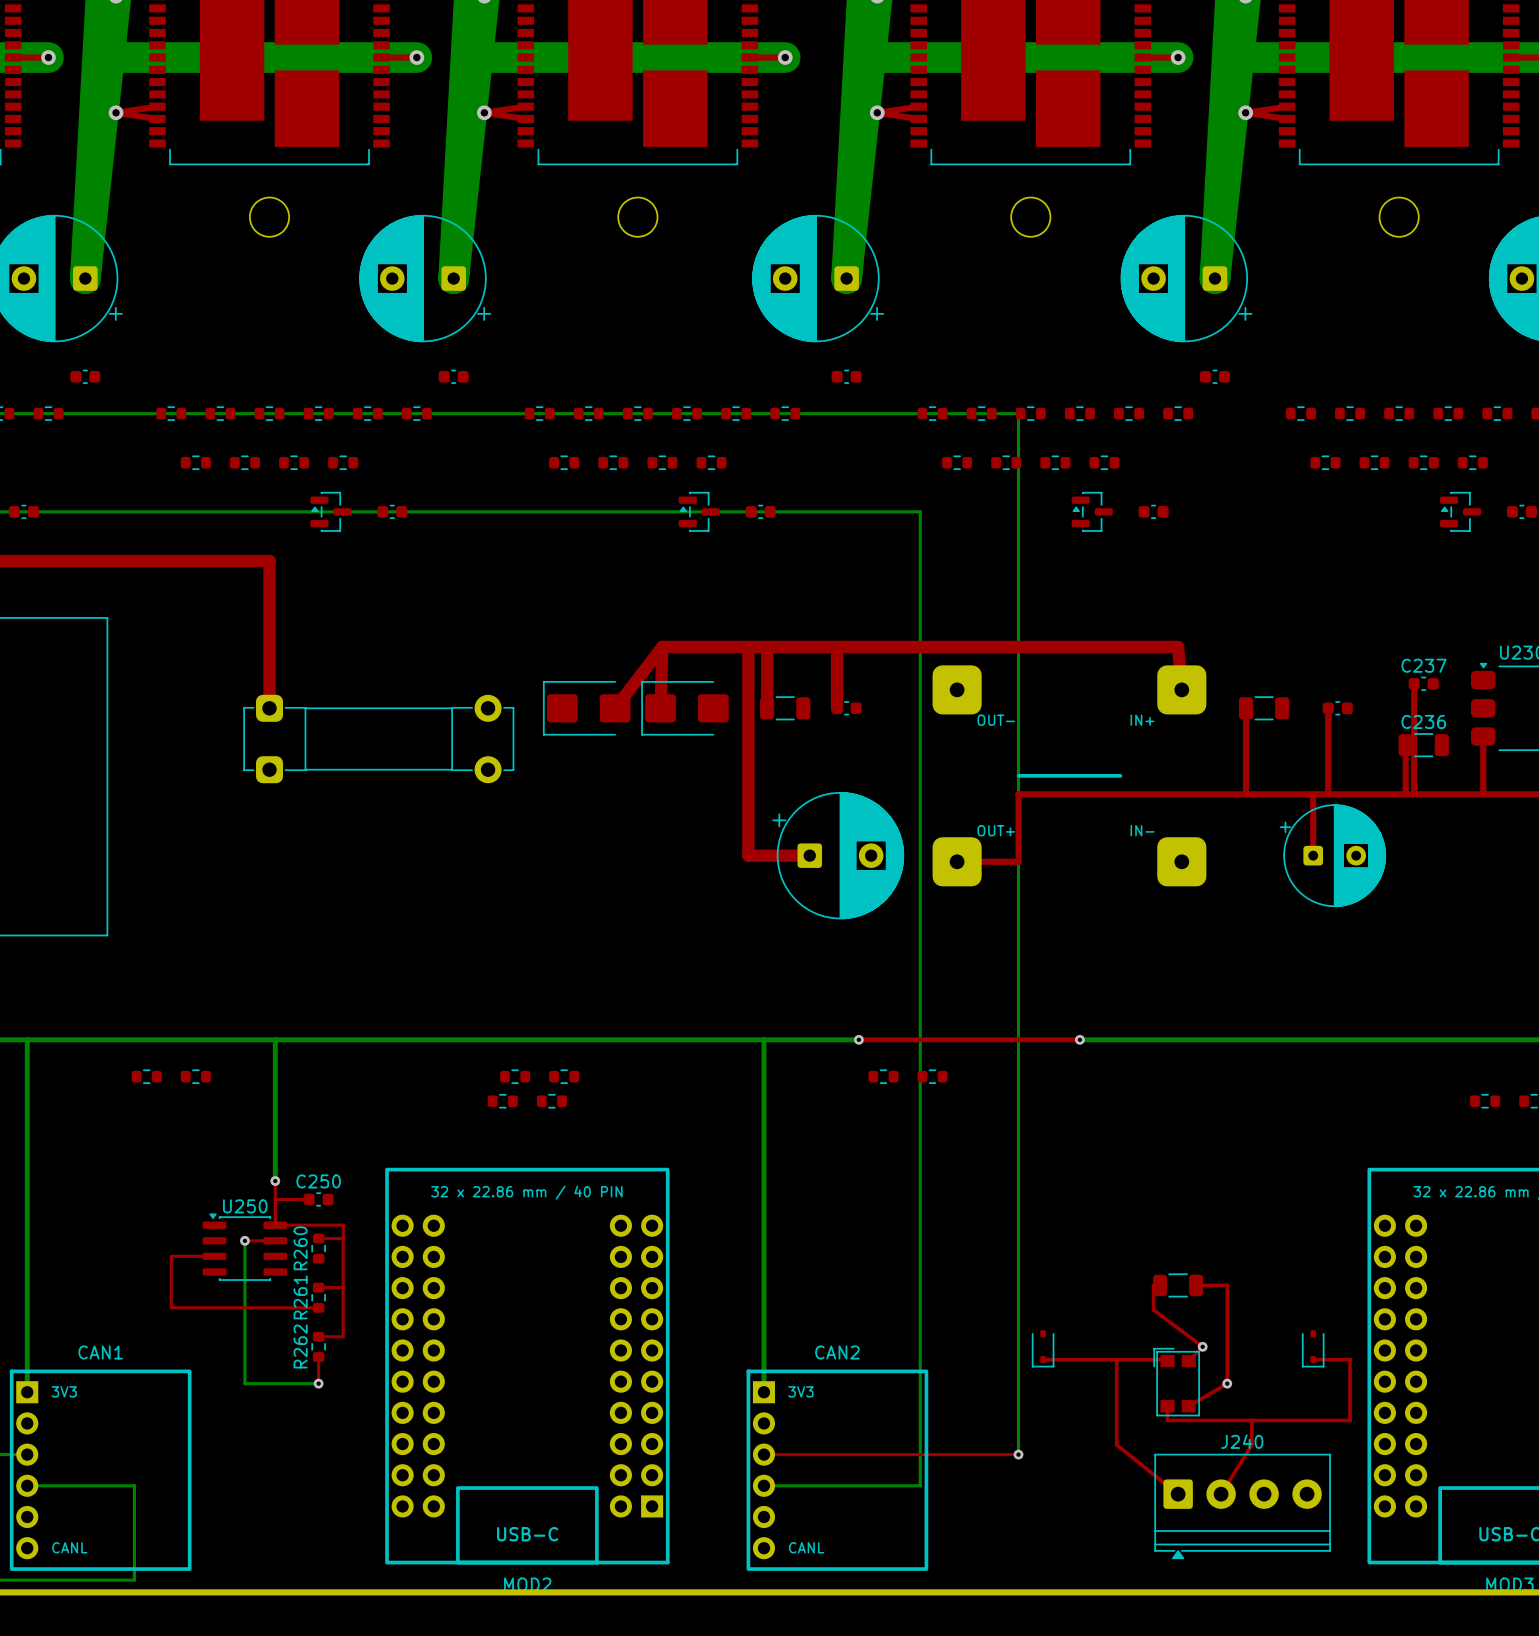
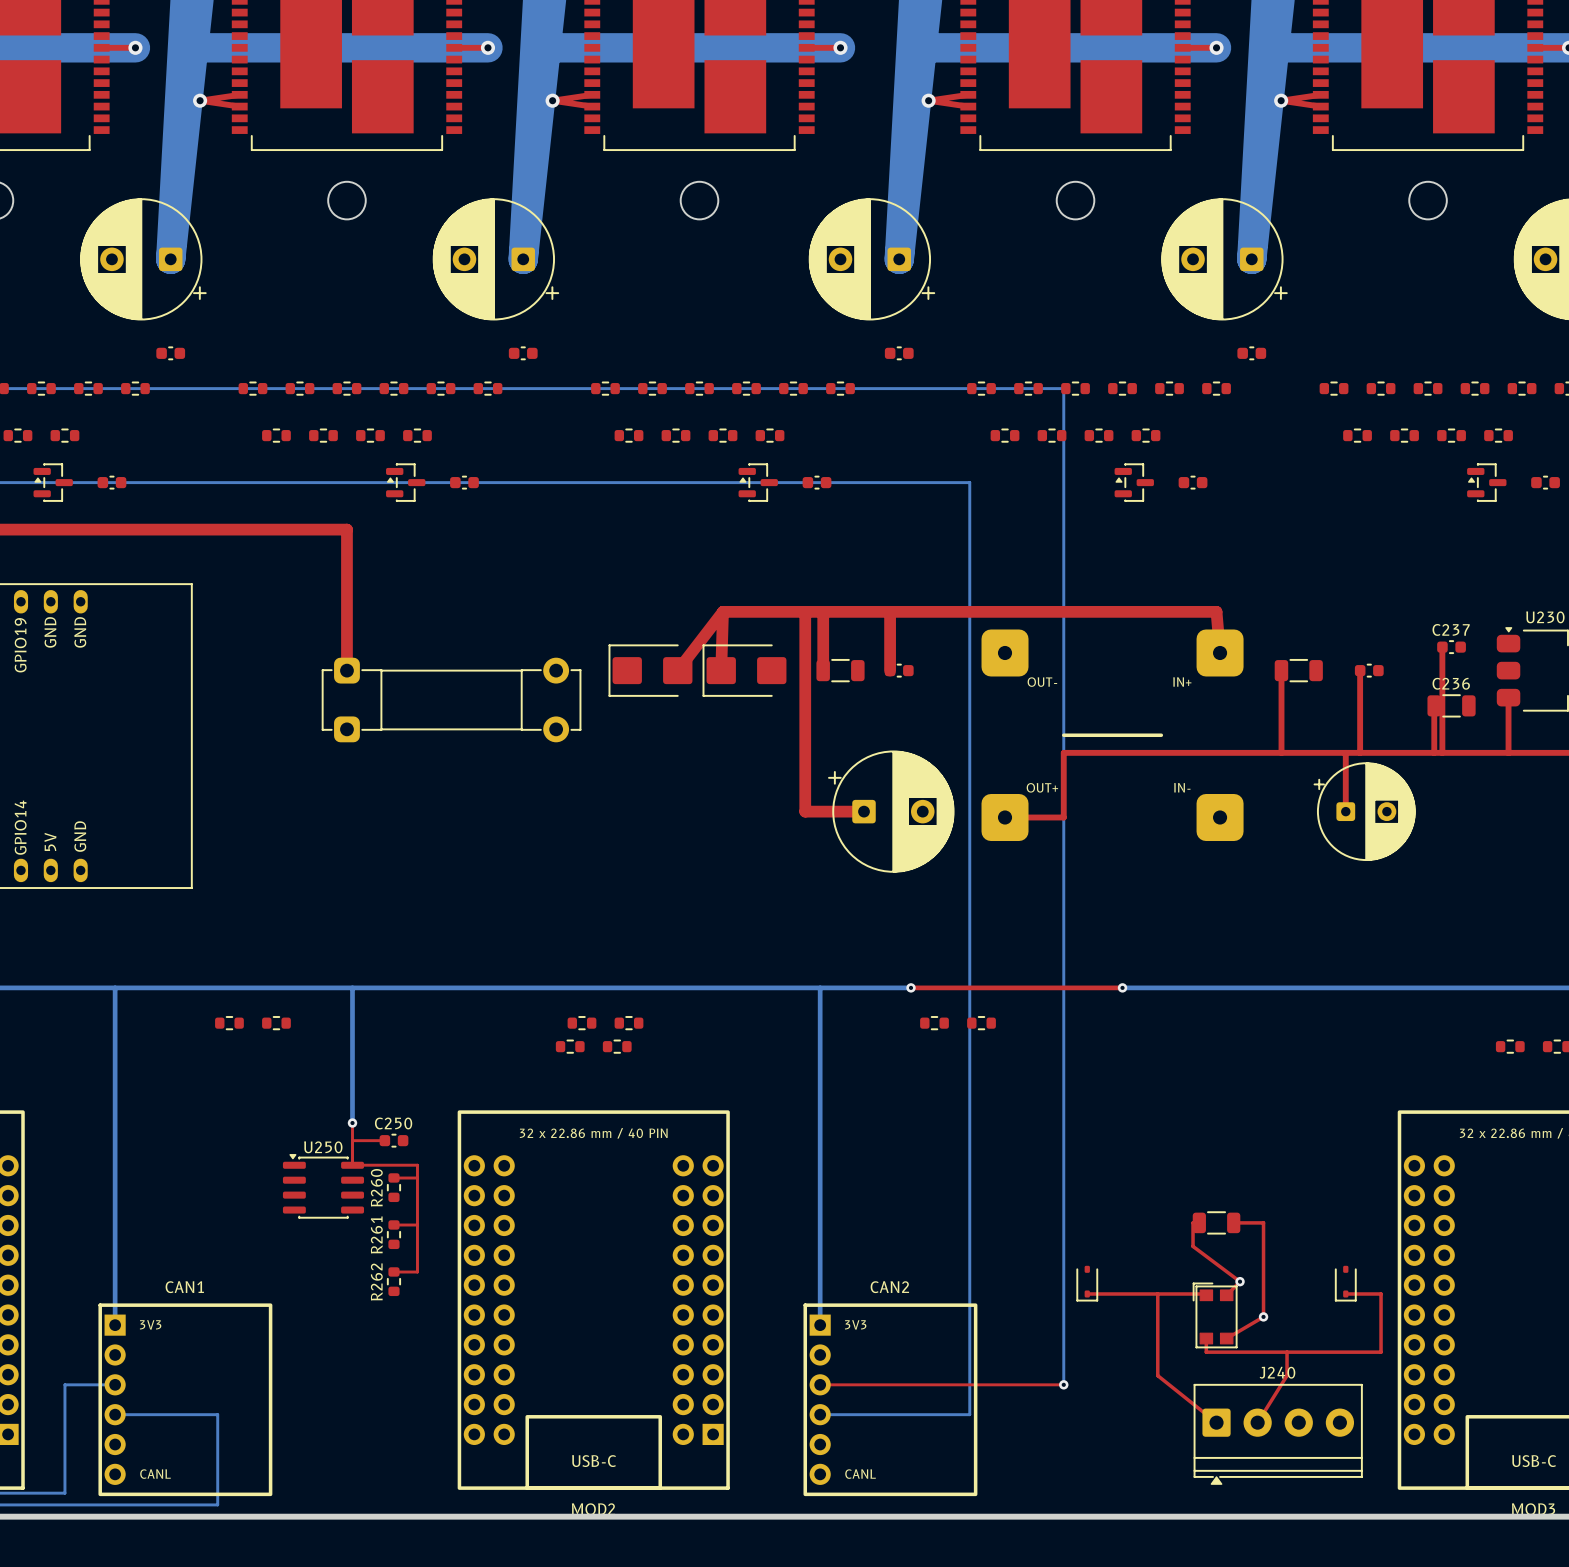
top track: (244, 1240) (275, 1240) -> none
bottom track: (244, 1240) (244, 1383) (318, 1383) -> none
via: (244, 1240) -> none
top track: (214, 1256) (171, 1256) (171, 1307) (318, 1307) -> none
top track: (318, 1356) (318, 1383) -> none
via: (318, 1383) -> none

